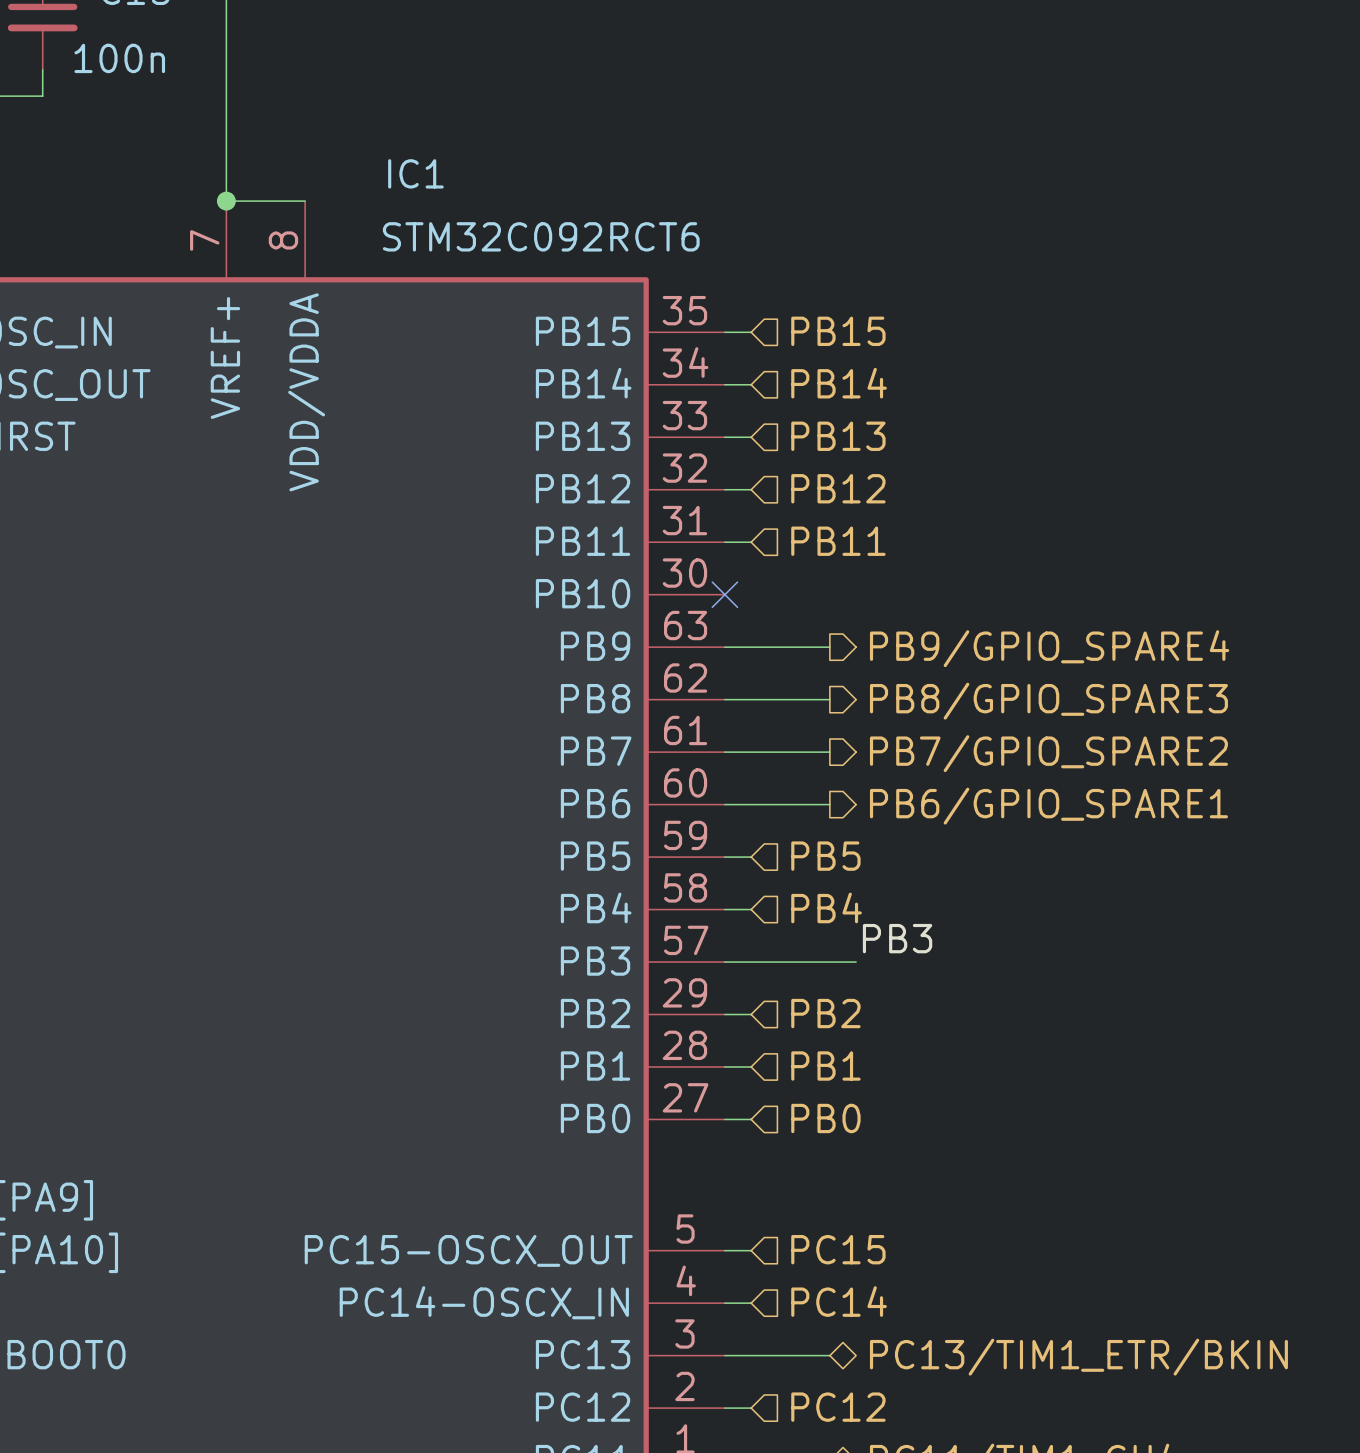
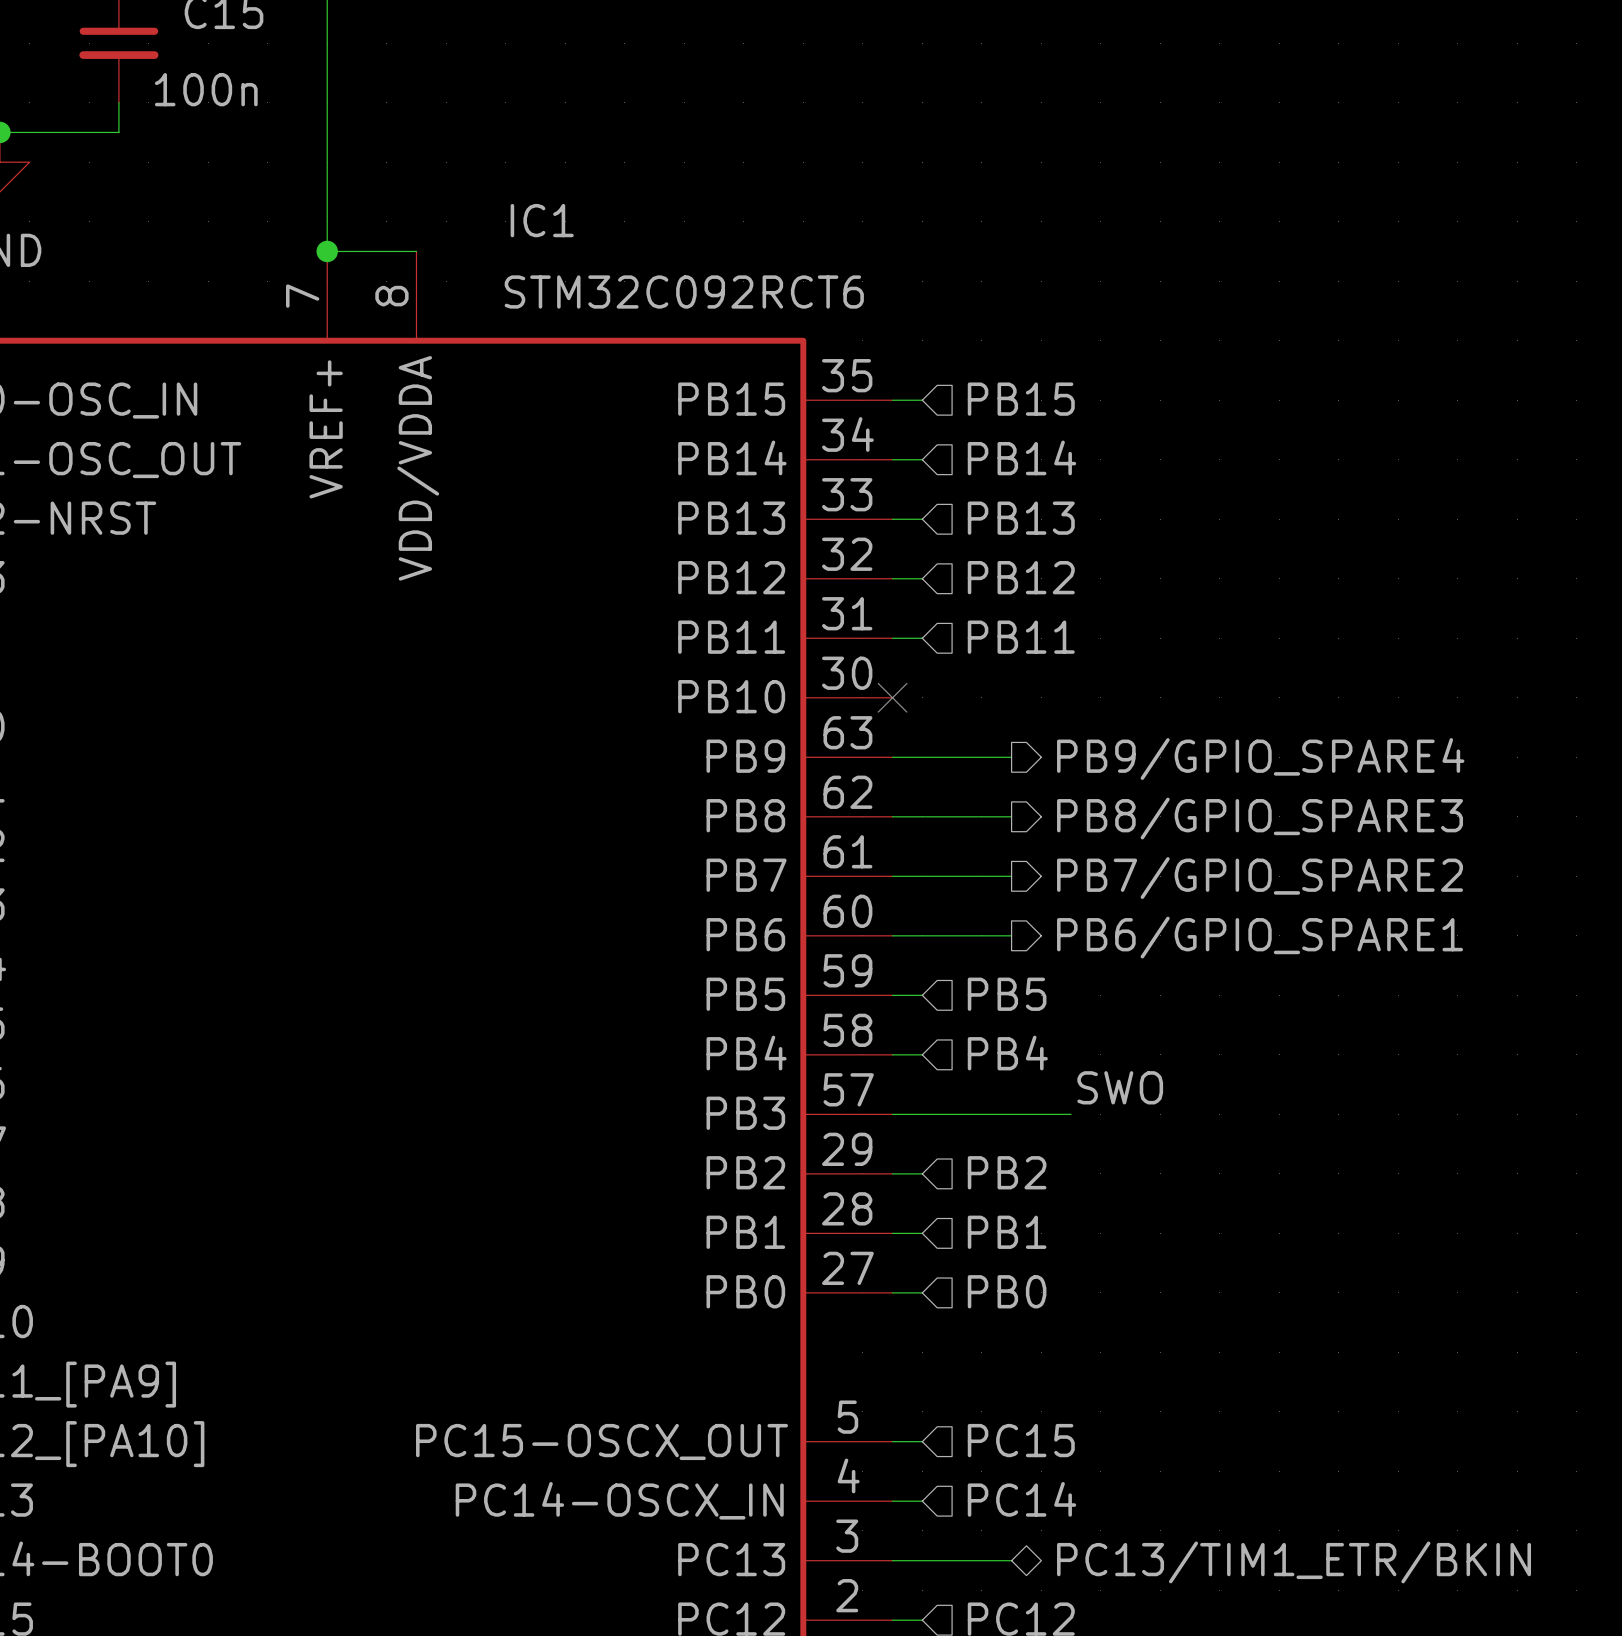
label: PB3 (897, 938) -> none
label: none -> SWO (1120, 1087)
wire: none -> (1041, 1114) (1071, 1114)

